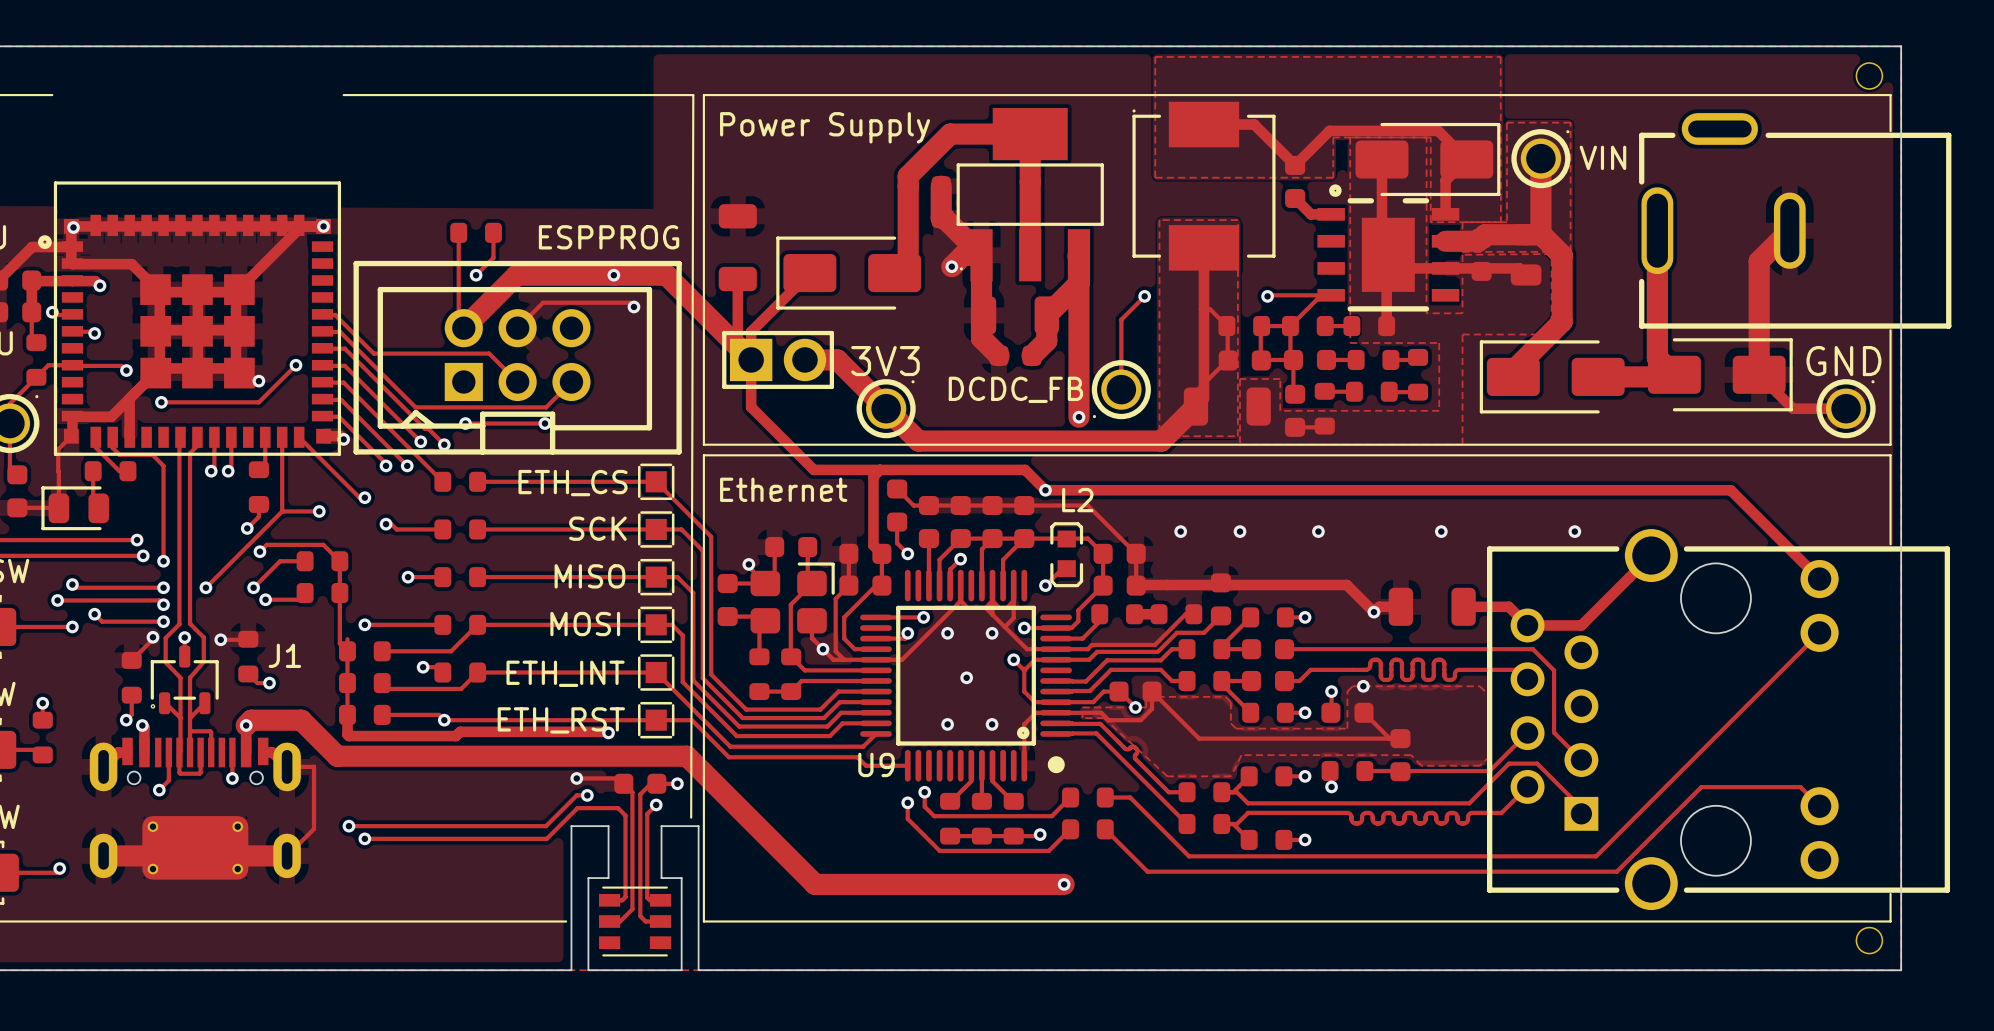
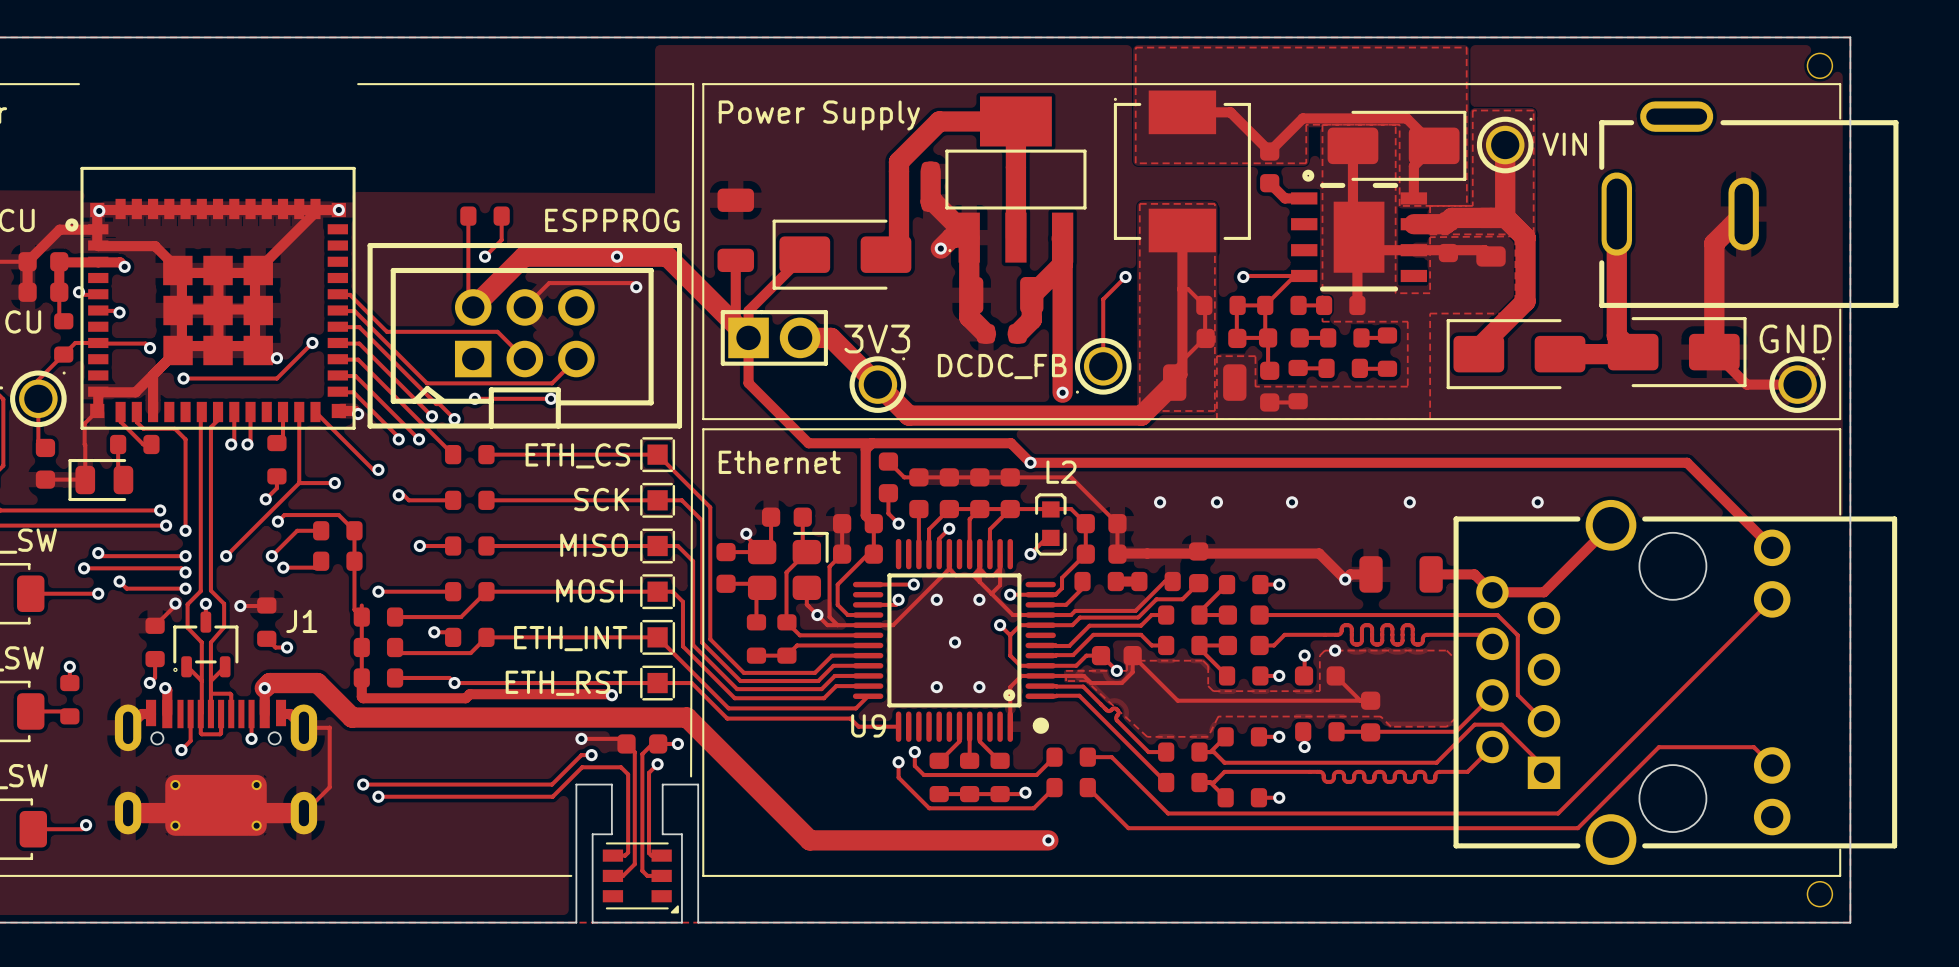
part footprint: [599, 886, 672, 957] -> [602, 842, 679, 914]

